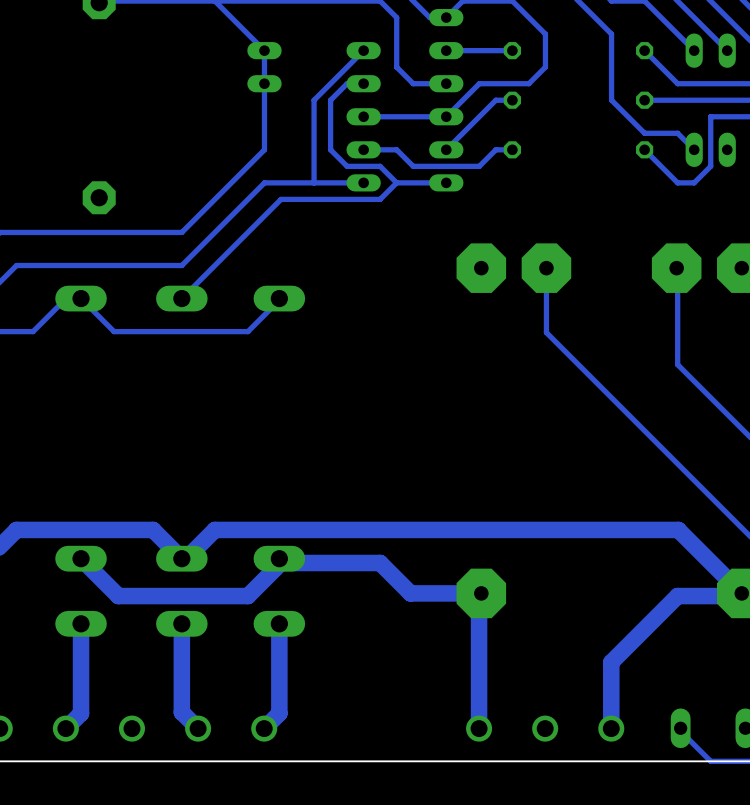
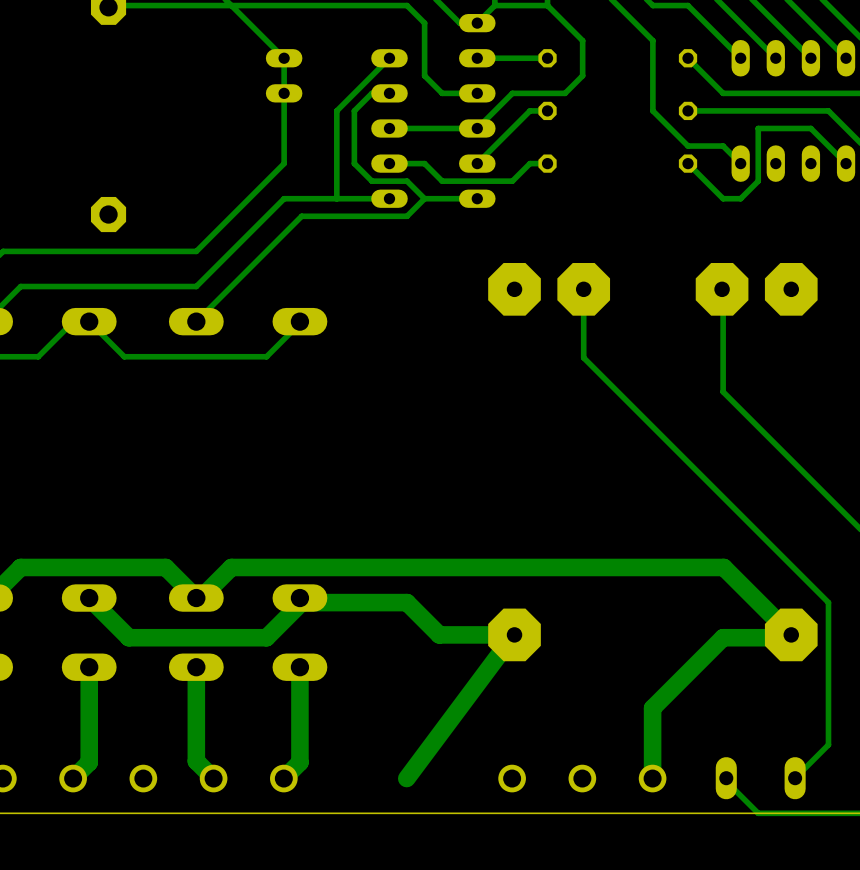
bottom track: (479, 595) (479, 728) -> (512, 637) (406, 778)

